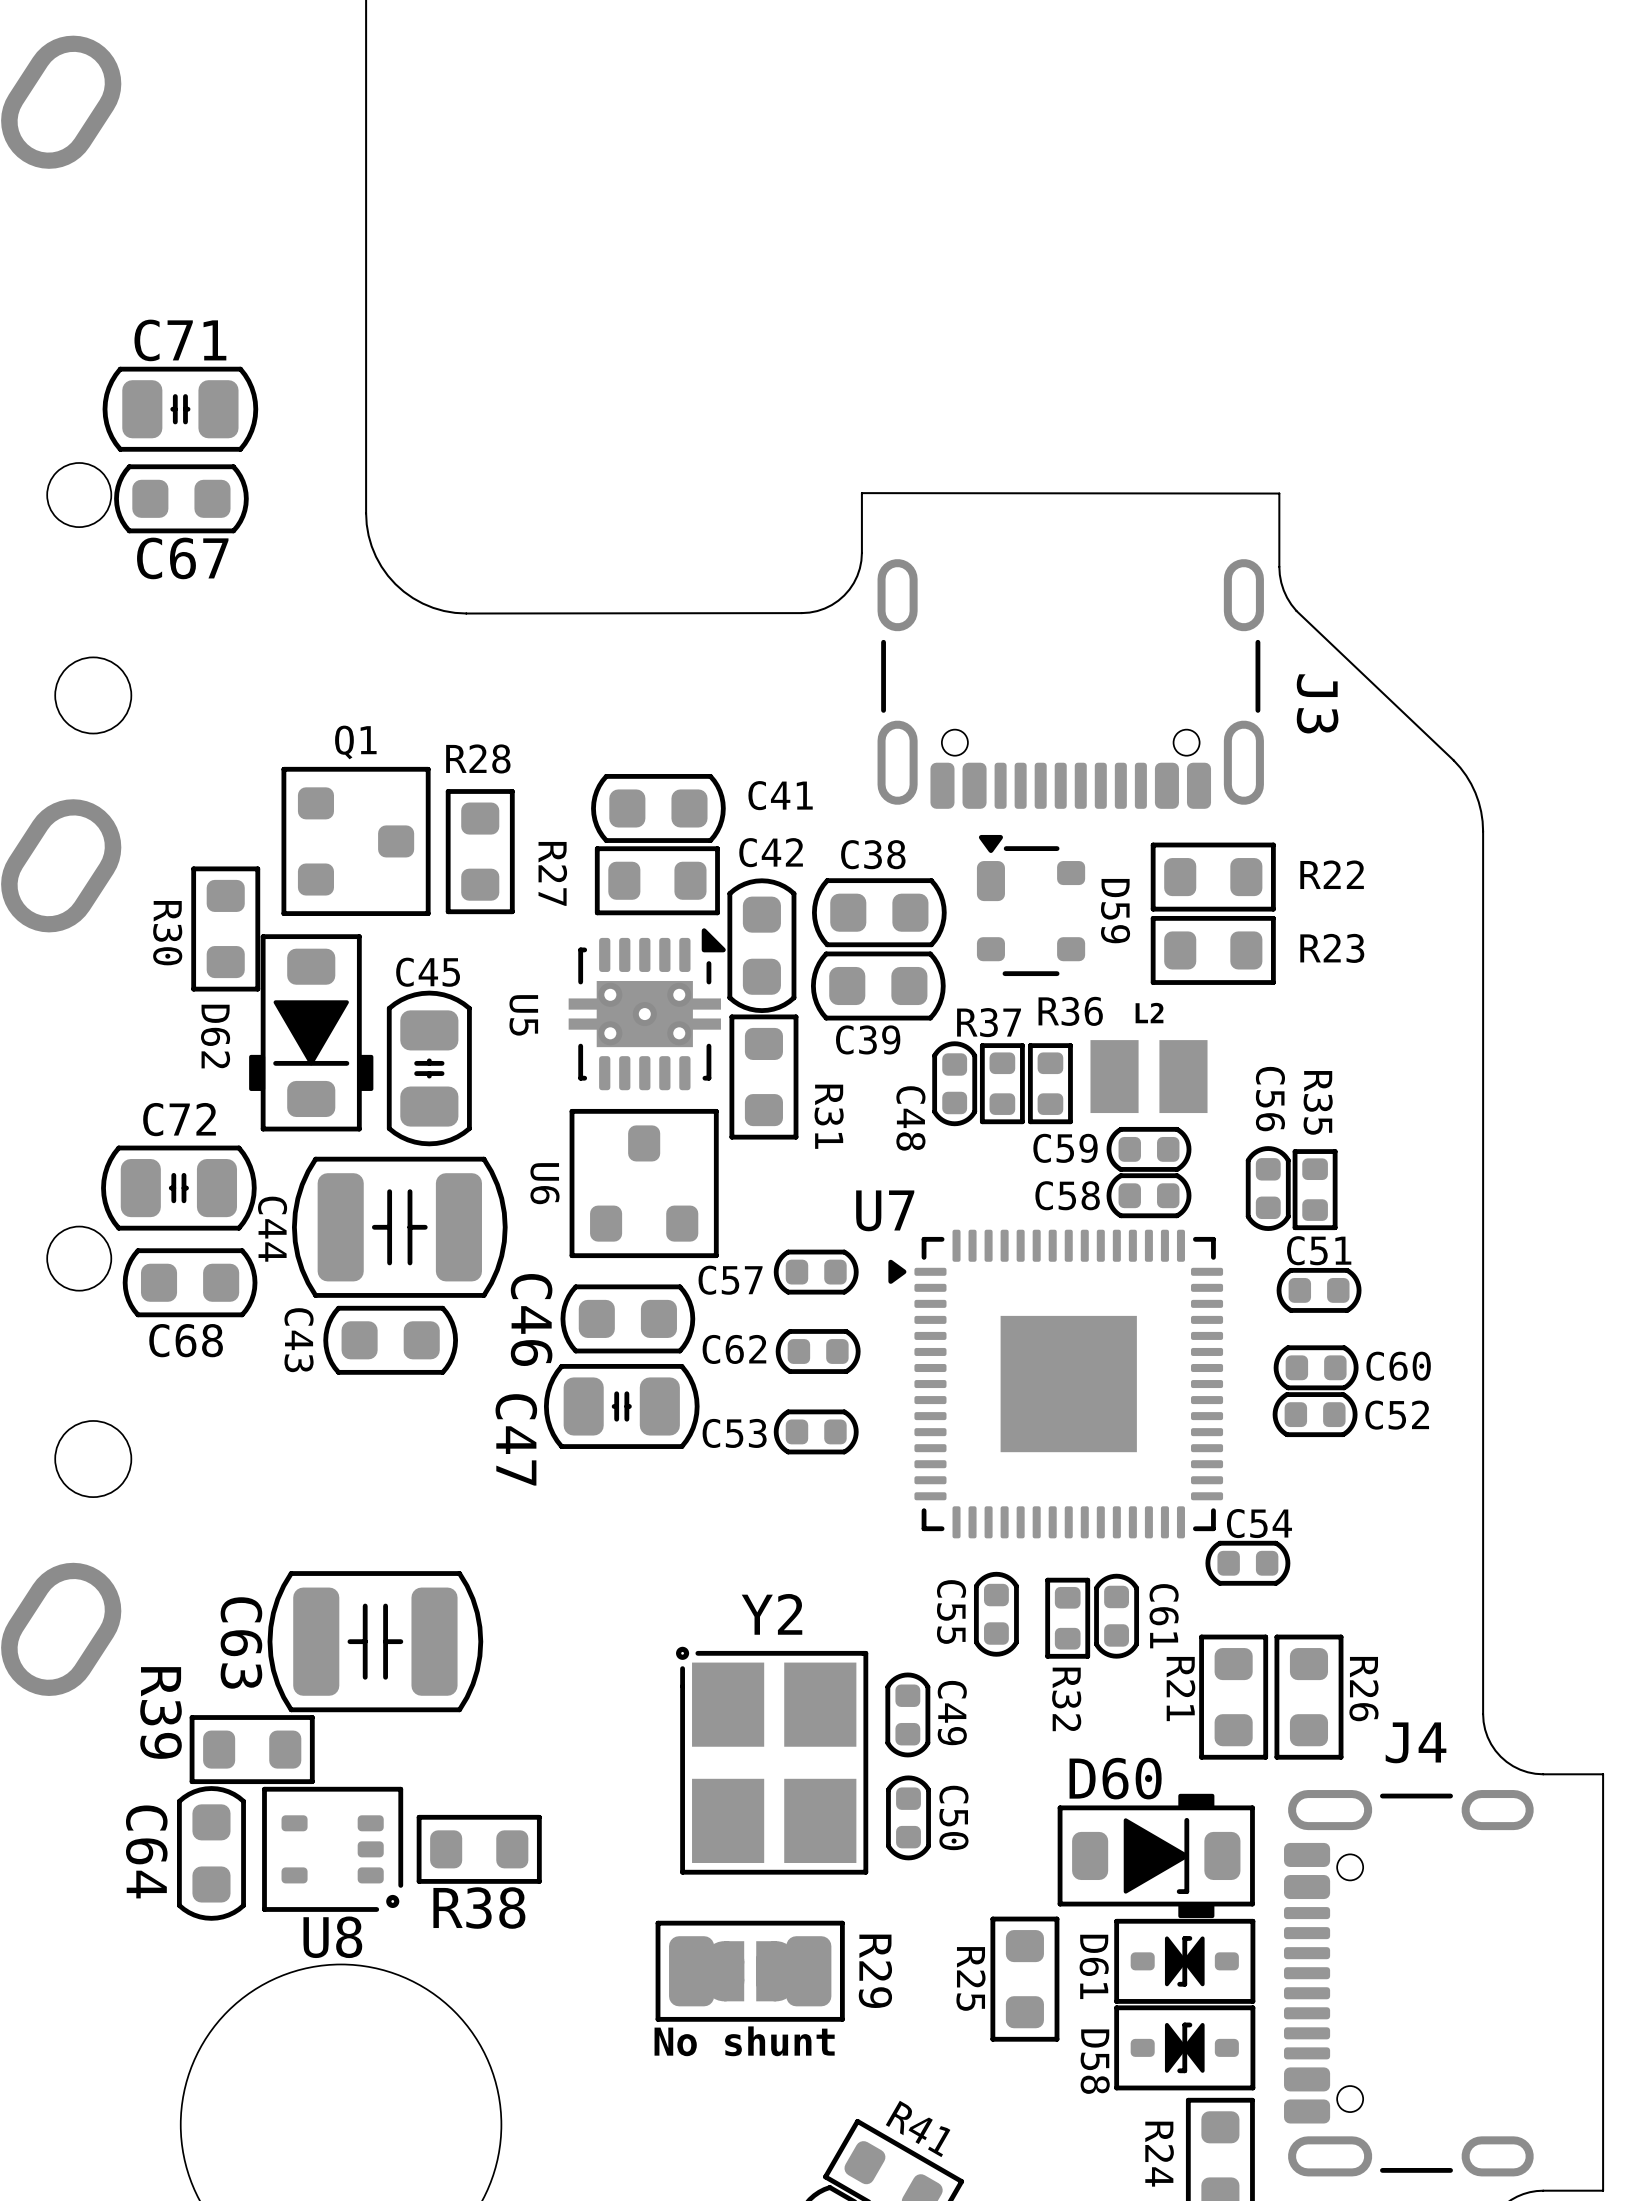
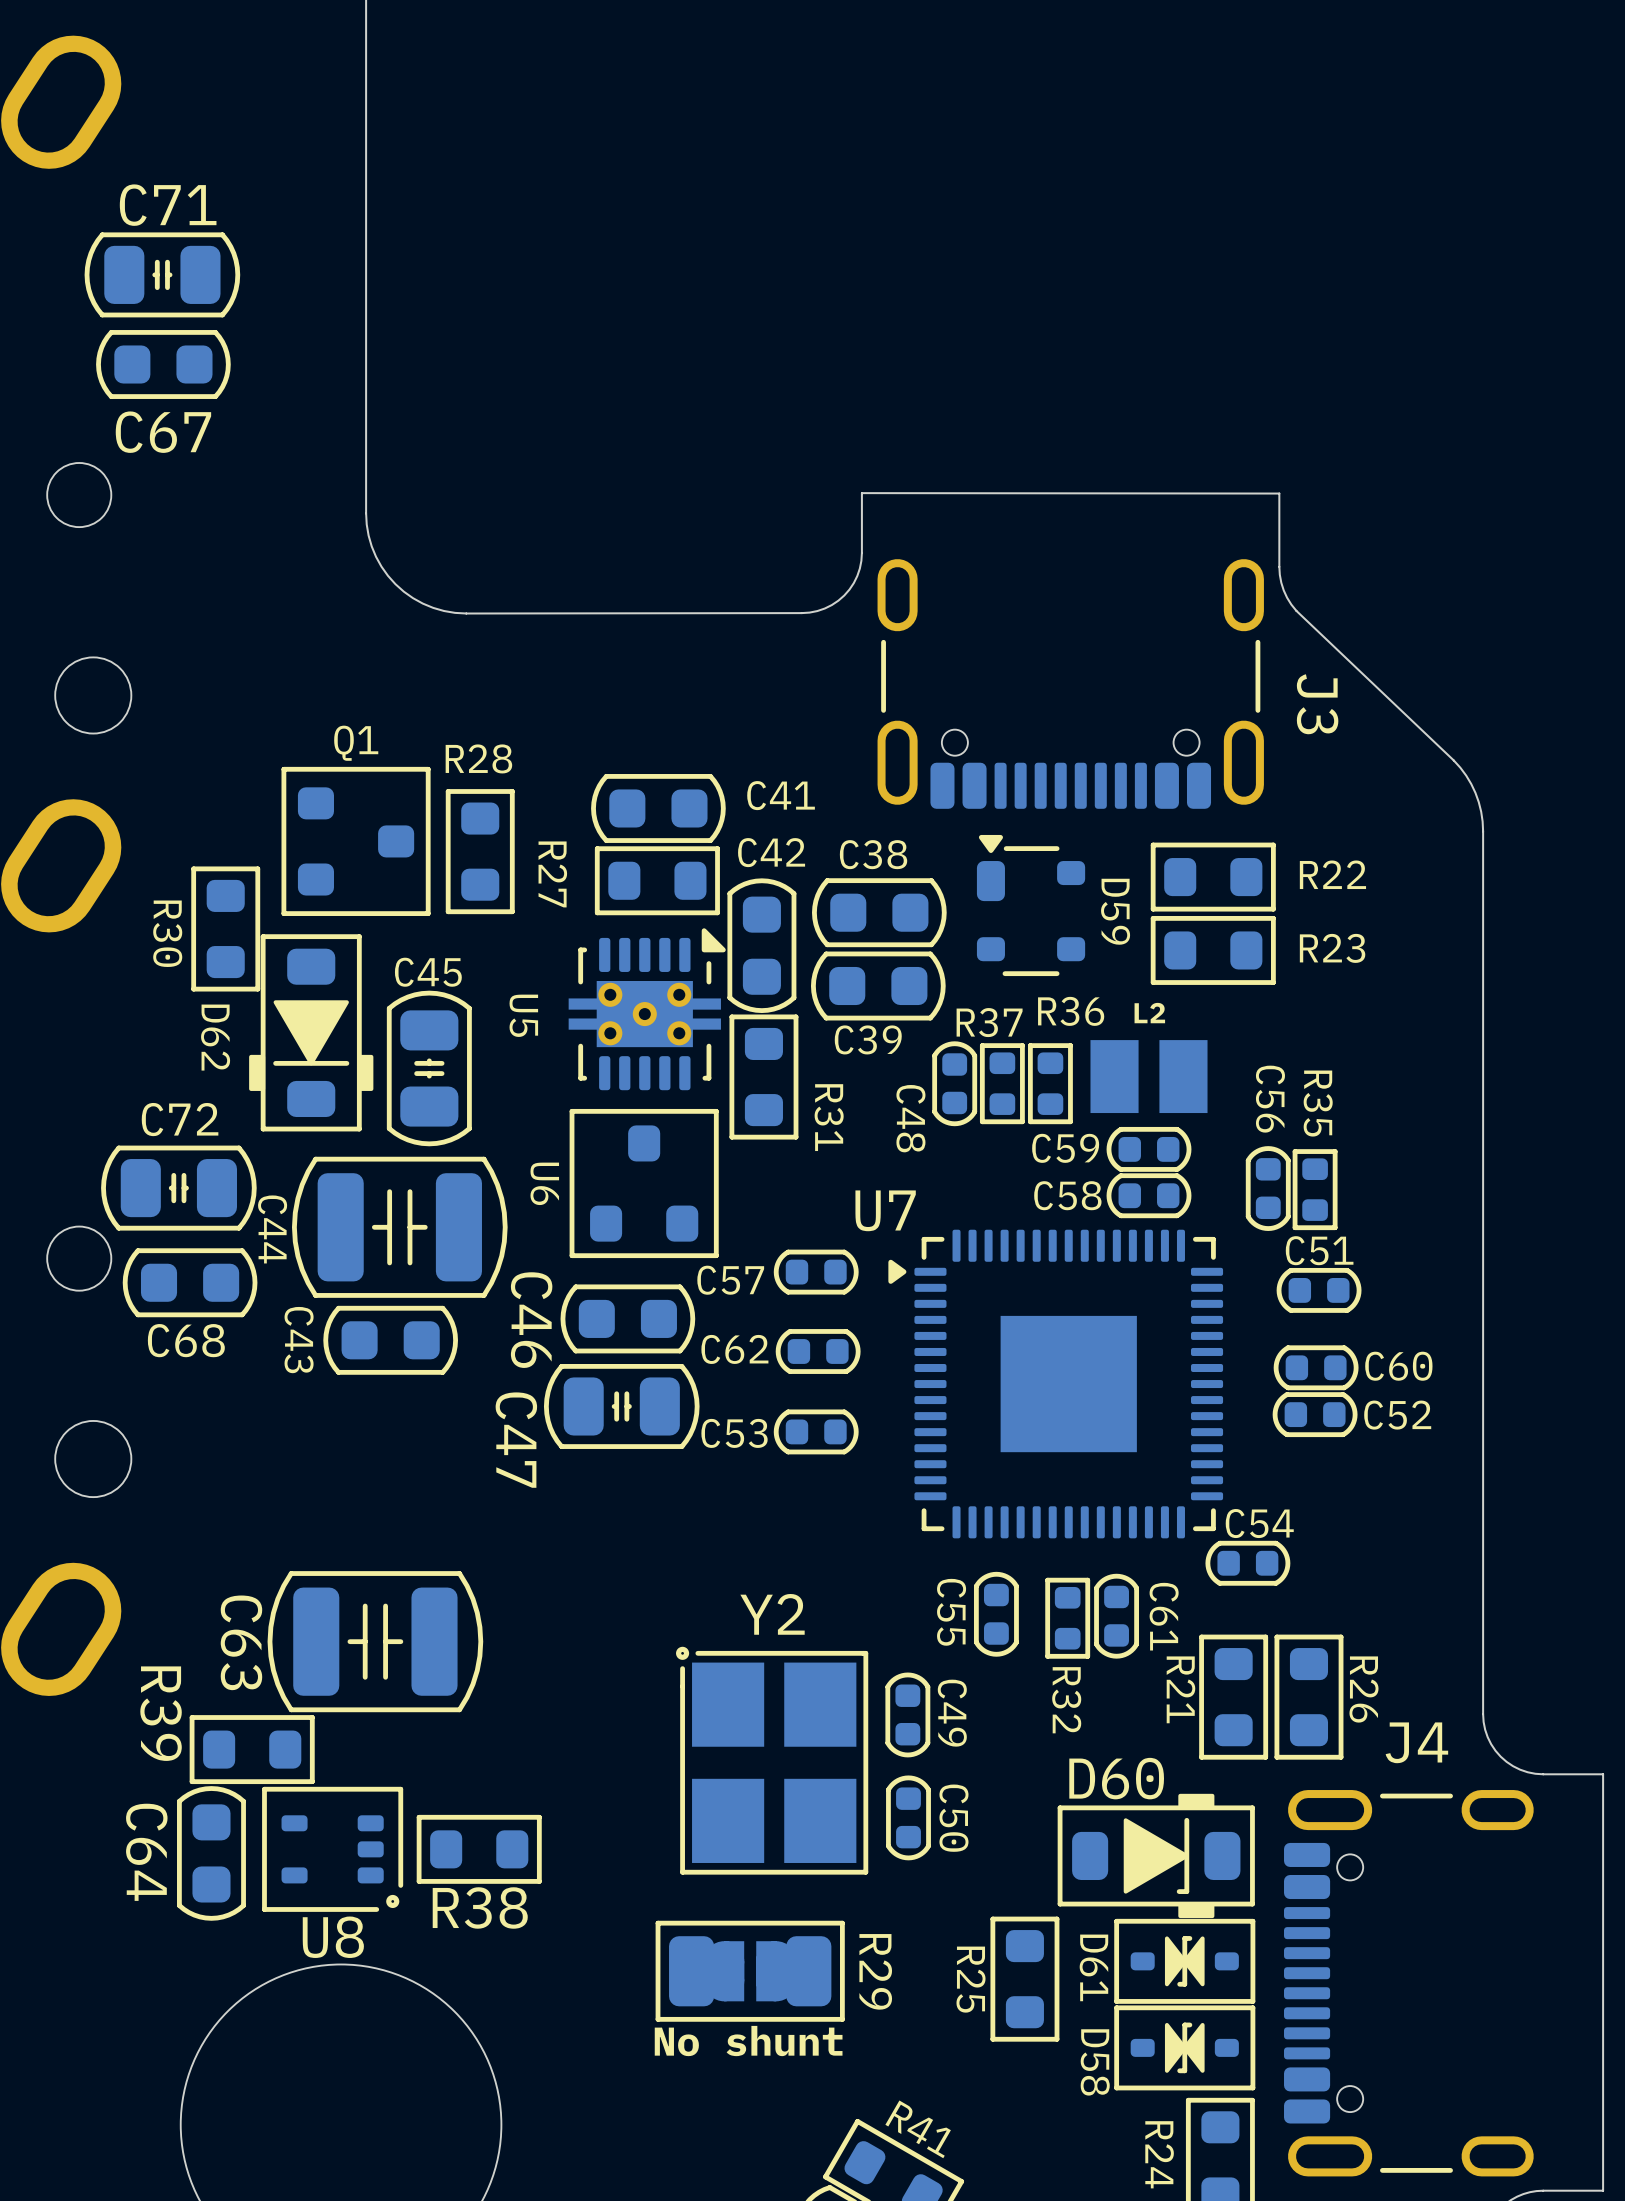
C71 name position: C71 (180, 340) -> C71 (168, 205)
C71 position: (180, 409) -> (162, 274)
C67 position: (181, 498) -> (163, 364)
C67 name position: C67 (182, 558) -> C67 (163, 432)

